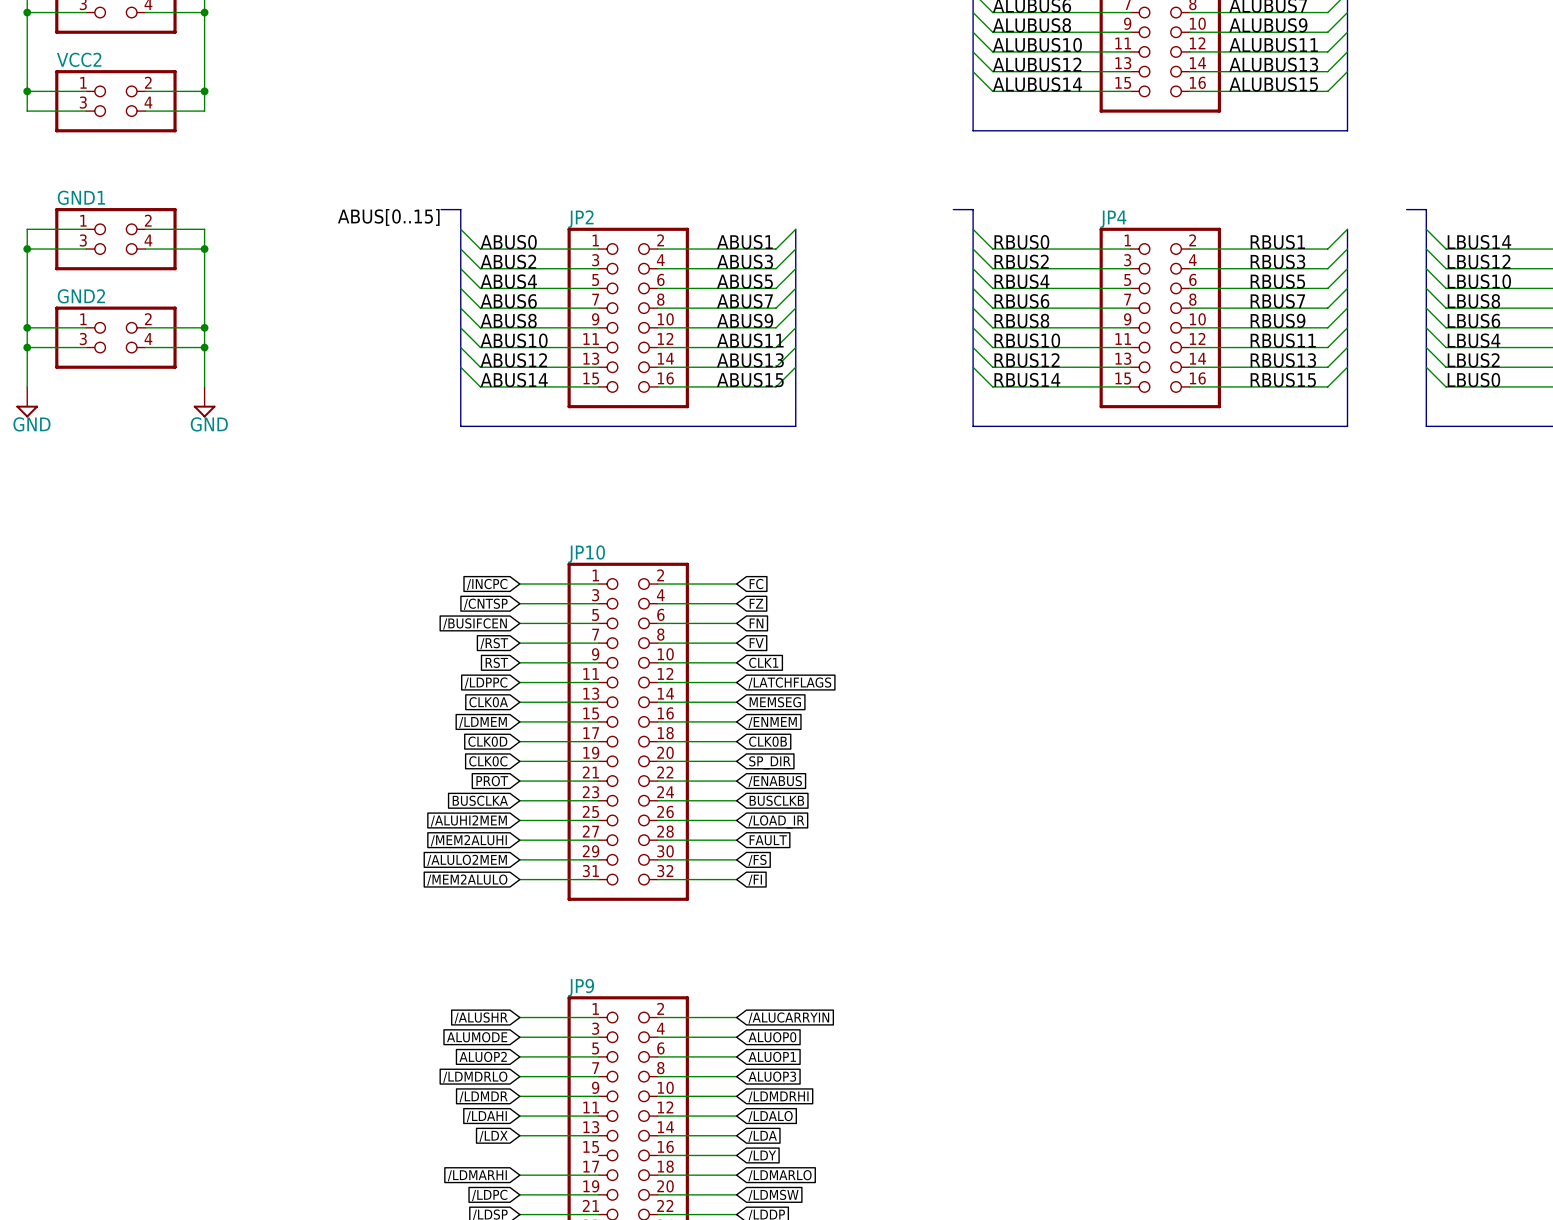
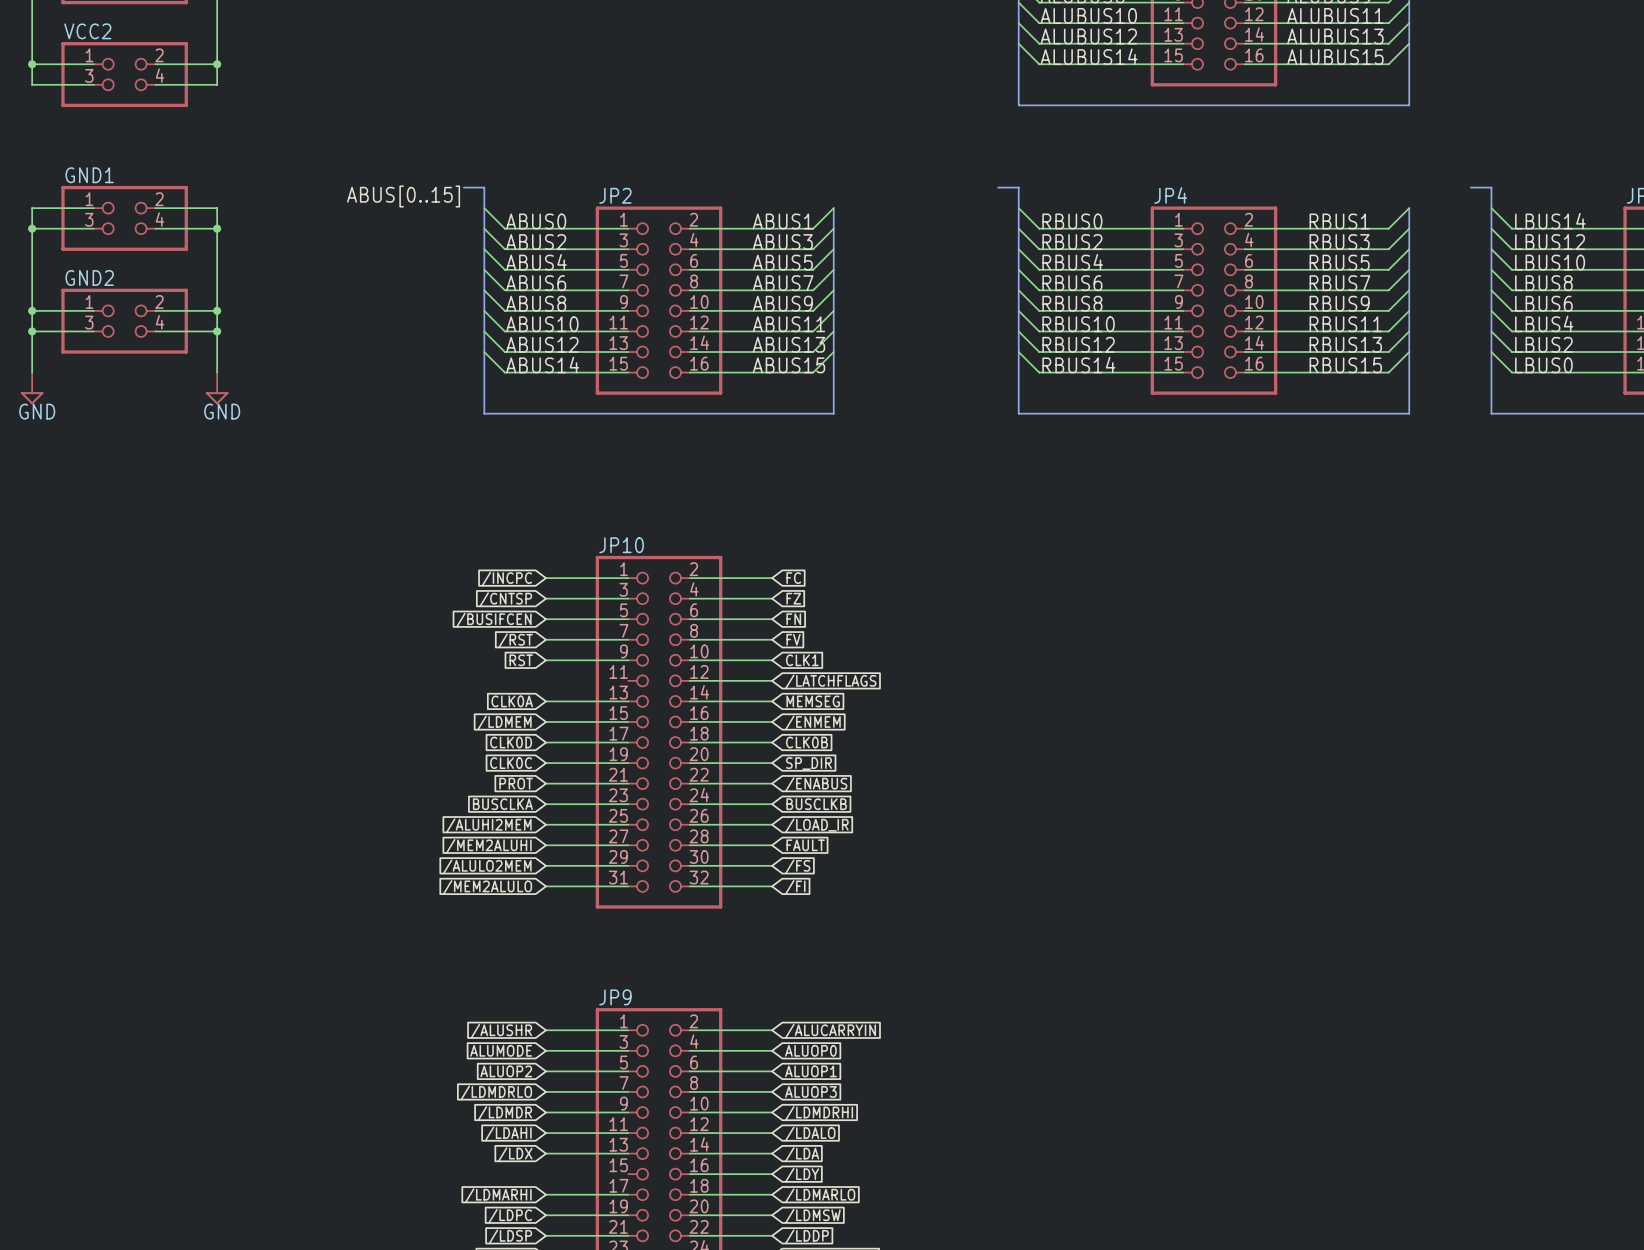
wire: (519, 682) (598, 682) -> none
global label: /LDPPC (486, 683) -> none

